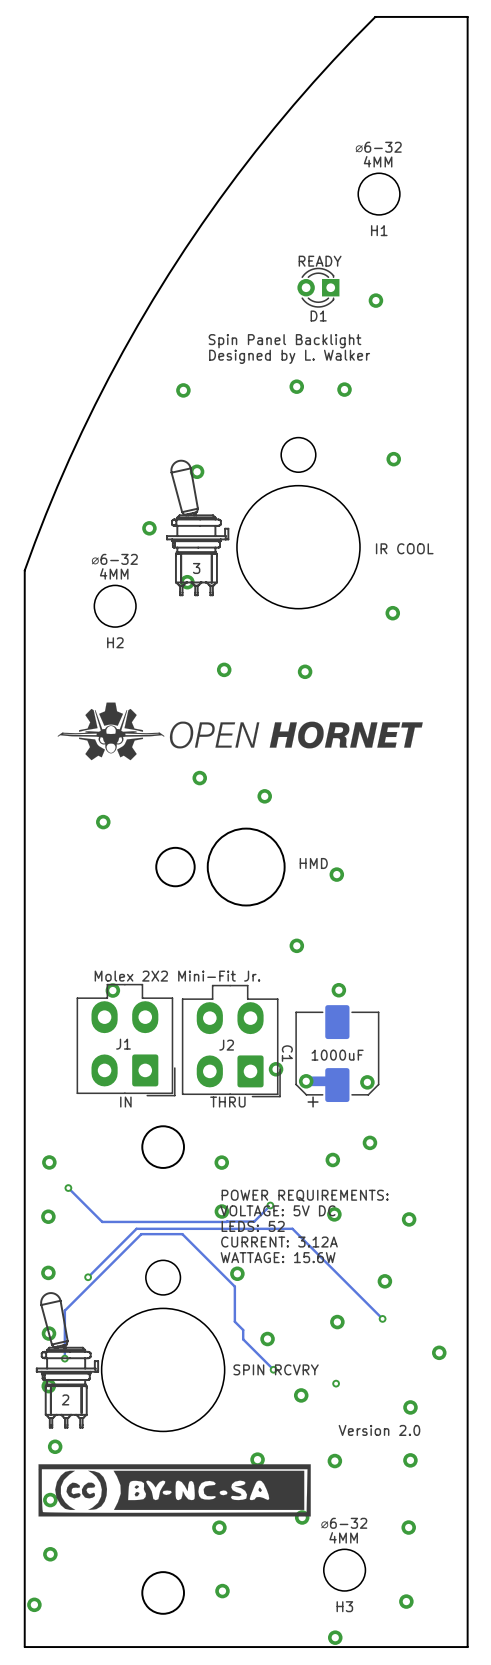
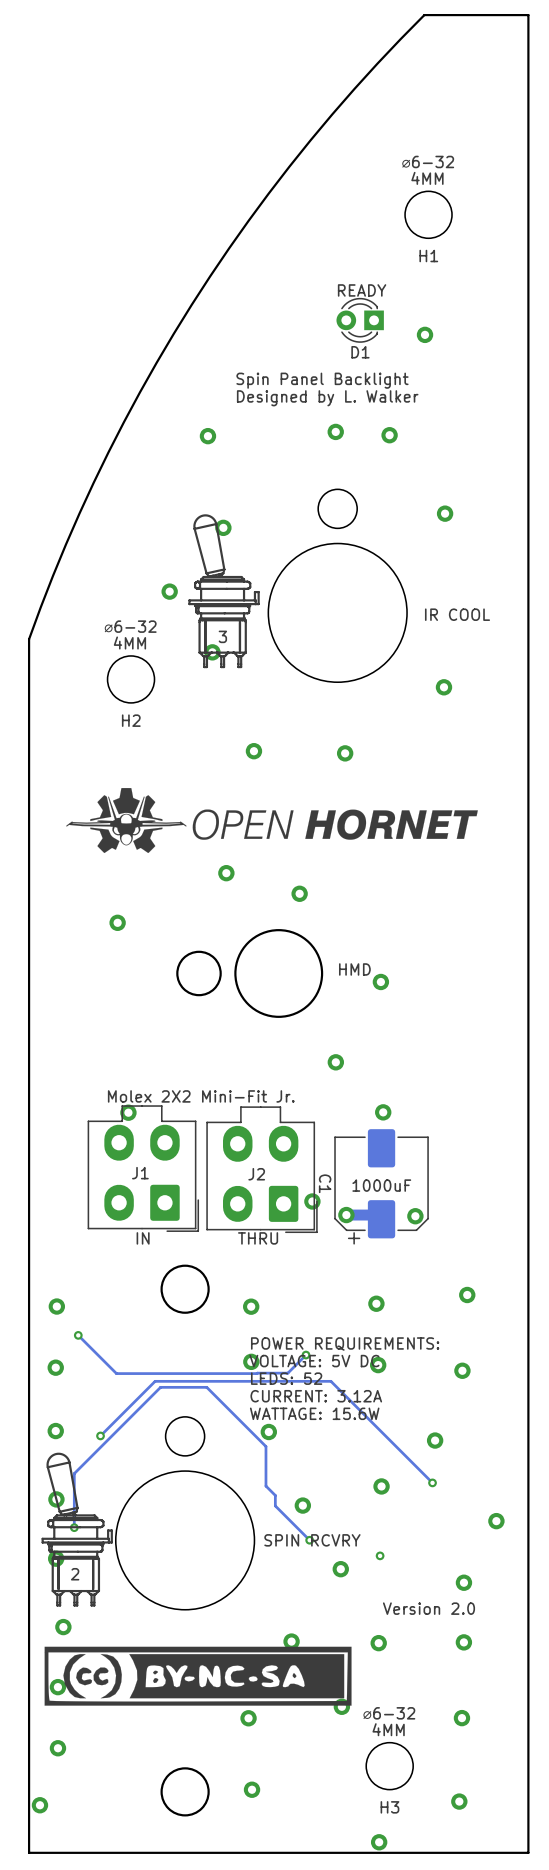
via position: (369, 1142) -> (467, 1295)

